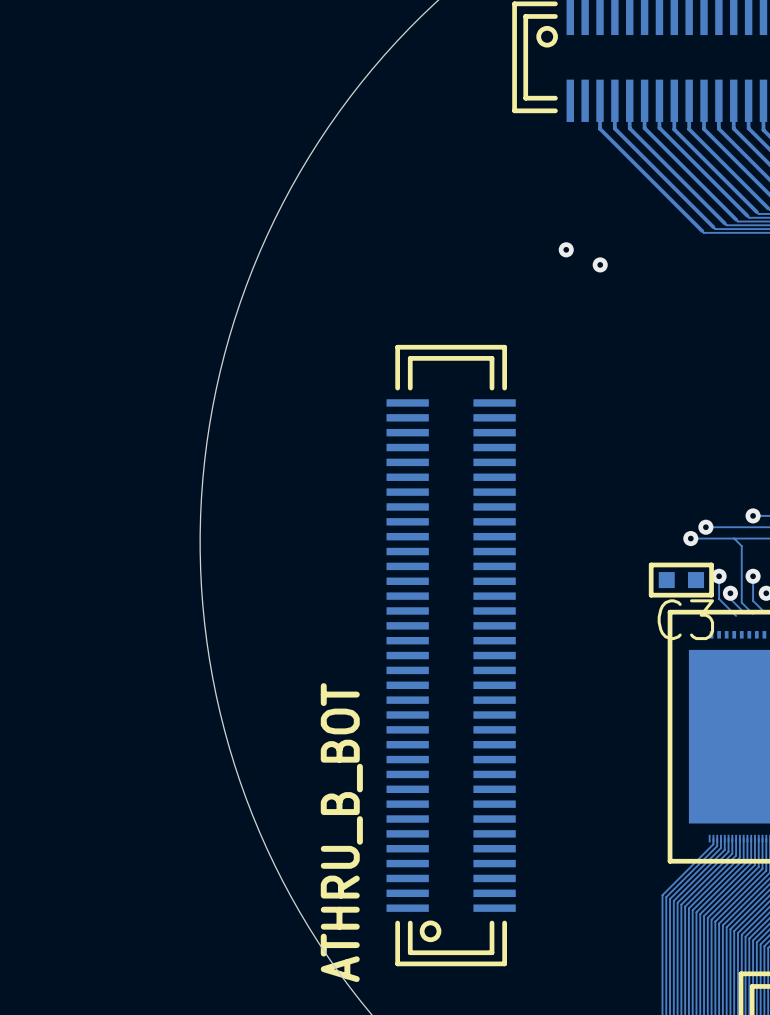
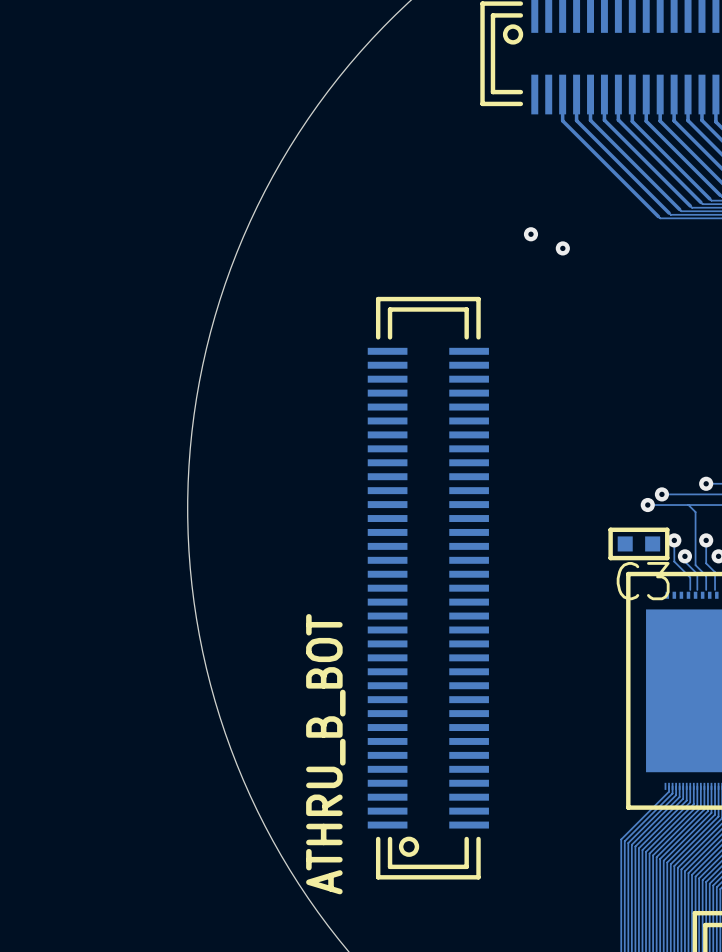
track: none -> (715, 572) (715, 589)
track: none -> (697, 574) (697, 589)
track: none -> (706, 575) (706, 589)
track: none -> (690, 577) (690, 589)
ATHRU_B_BOT position: (451, 655) -> (428, 588)

